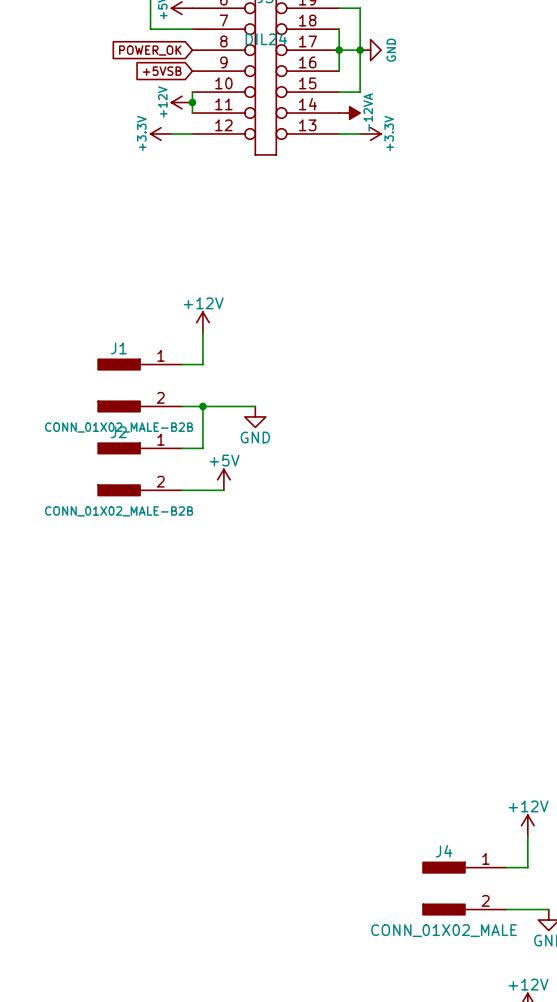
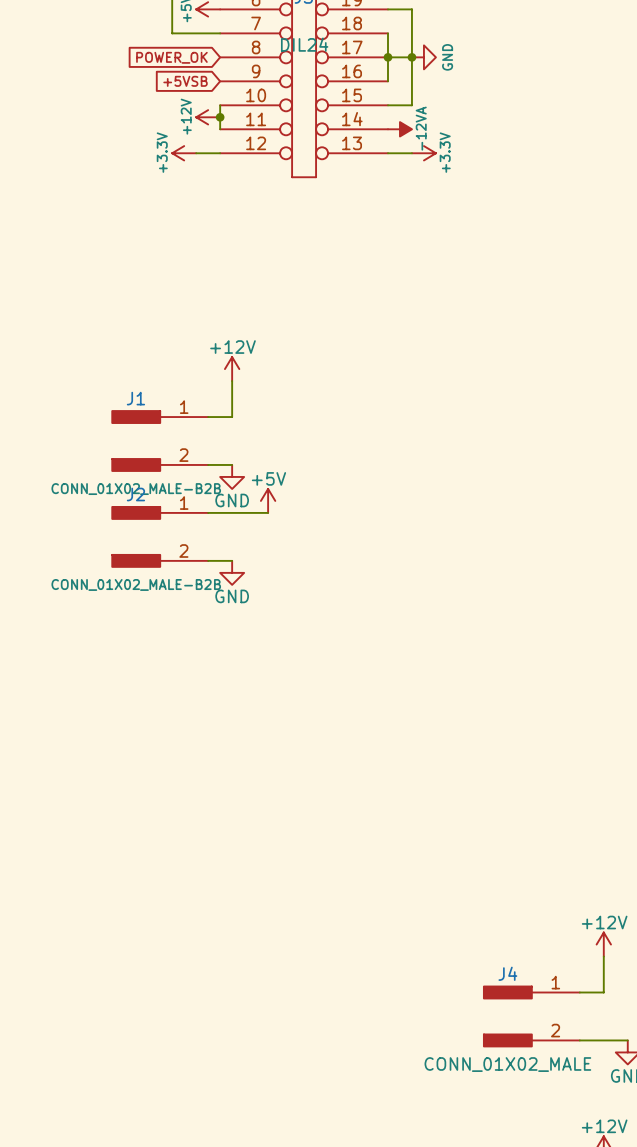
junction: (202, 406) -> none
wire: (255, 406) (202, 406) (202, 448) -> (268, 512) (232, 512)
power symbol: none -> GND (232, 476)
power symbol: GND (255, 416) -> none
power symbol position: +5V (223, 479) -> +5V (268, 500)
wire: (202, 490) (223, 490) -> none
power symbol: none -> GND (232, 572)

